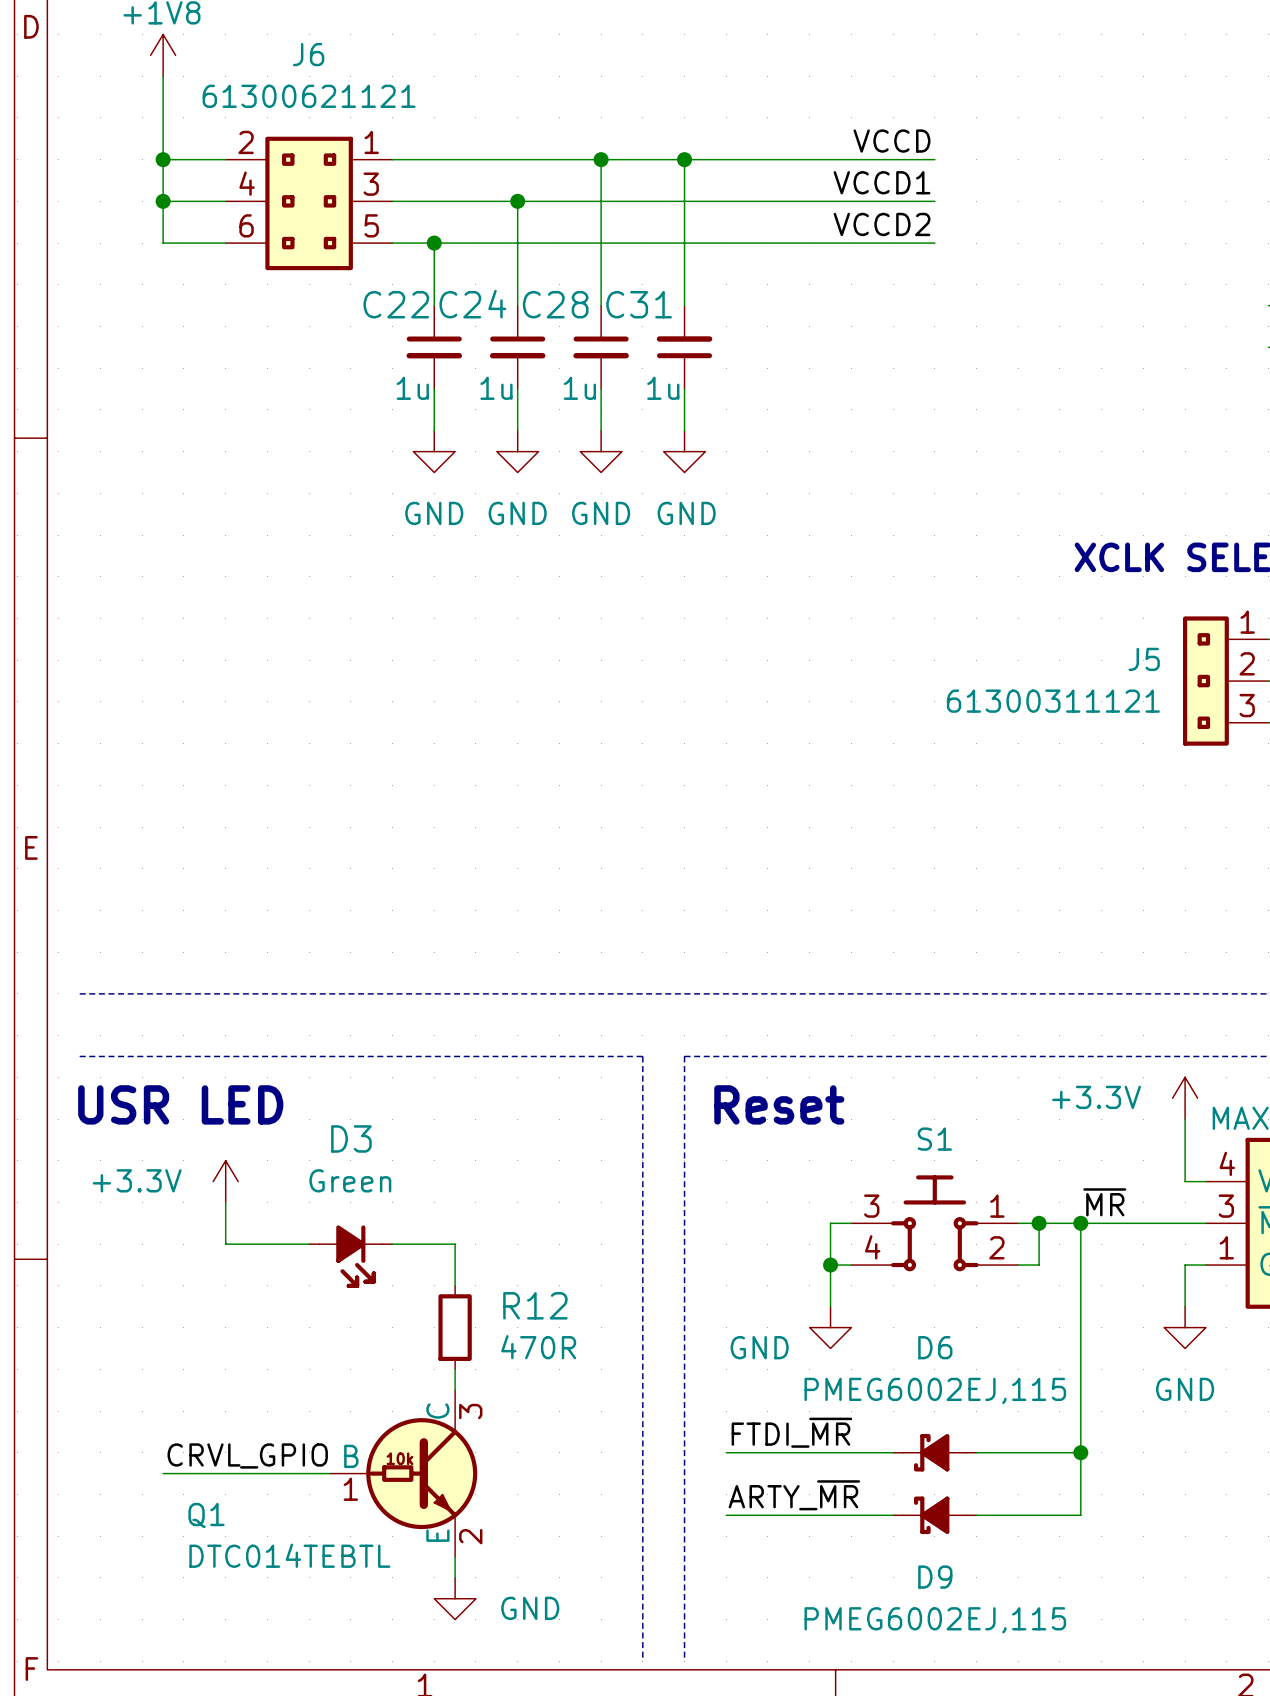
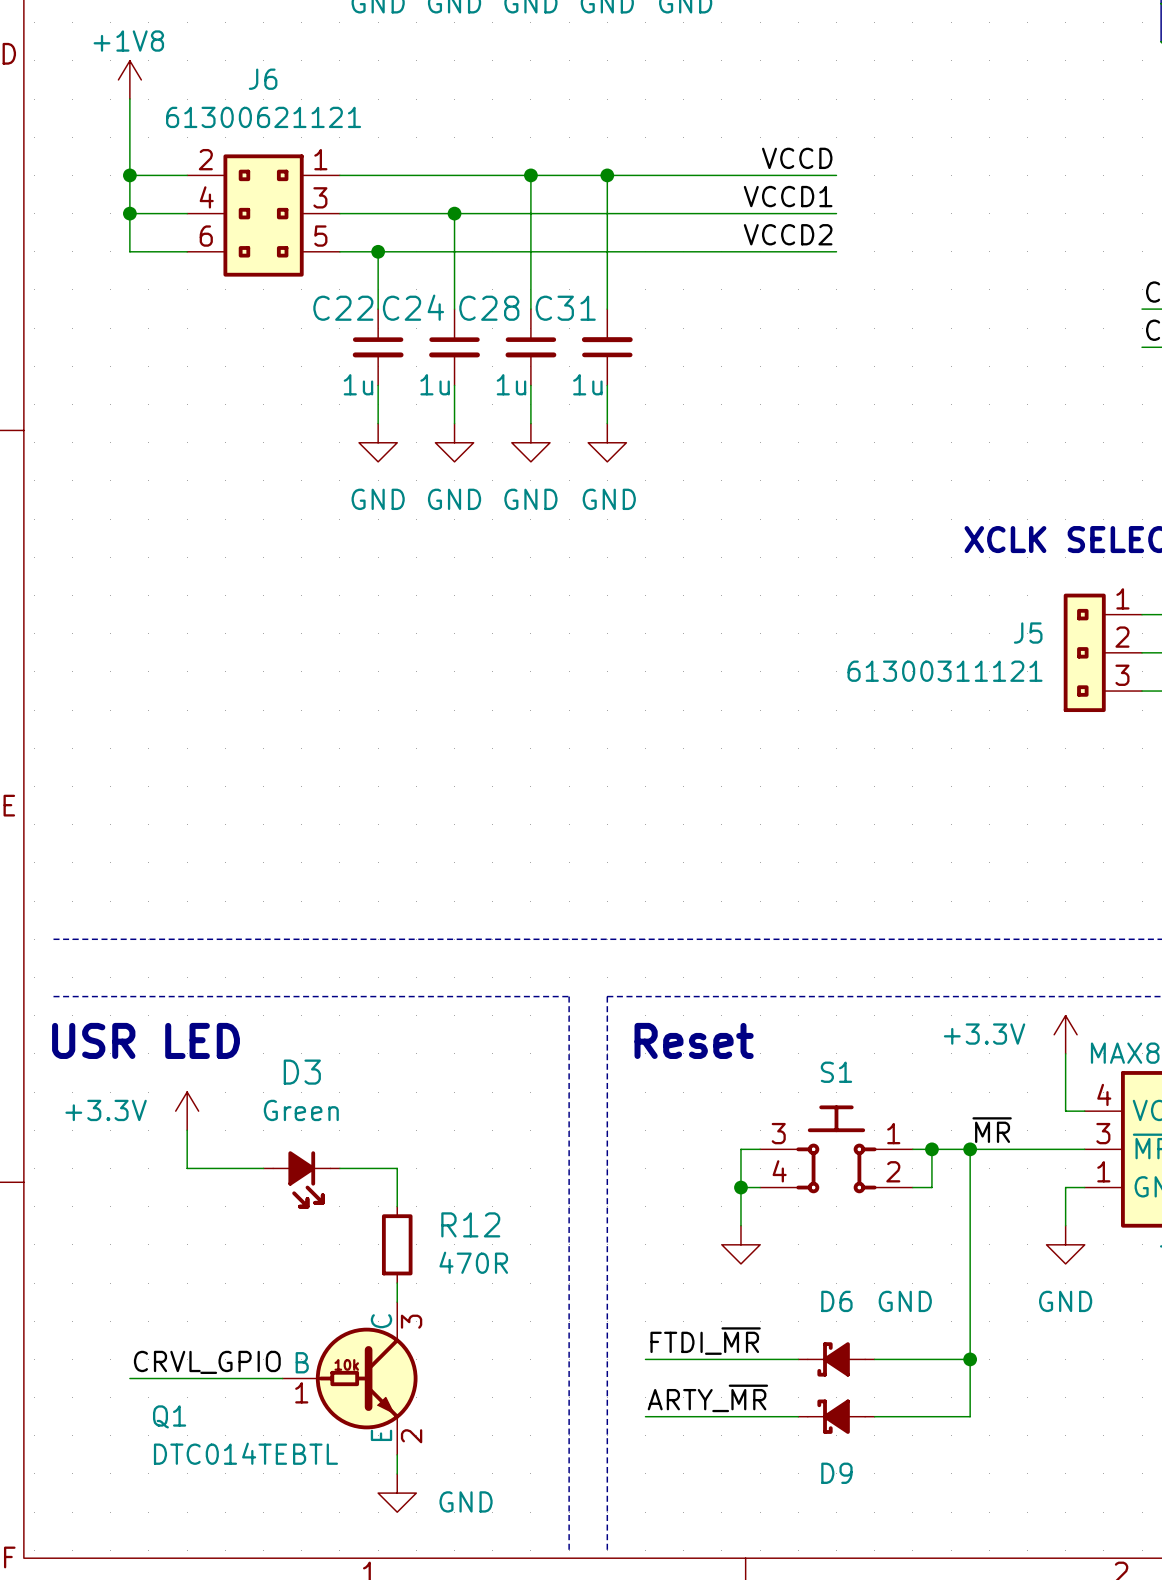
power symbol text position: GND (759, 1347) -> GND (905, 1301)
D6 name position: D6 (935, 1347) -> D6 (836, 1301)
D6 text: PMEG6002EJ,115 (935, 1390) -> none
D9 text: PMEG6002EJ,115 (935, 1620) -> none

